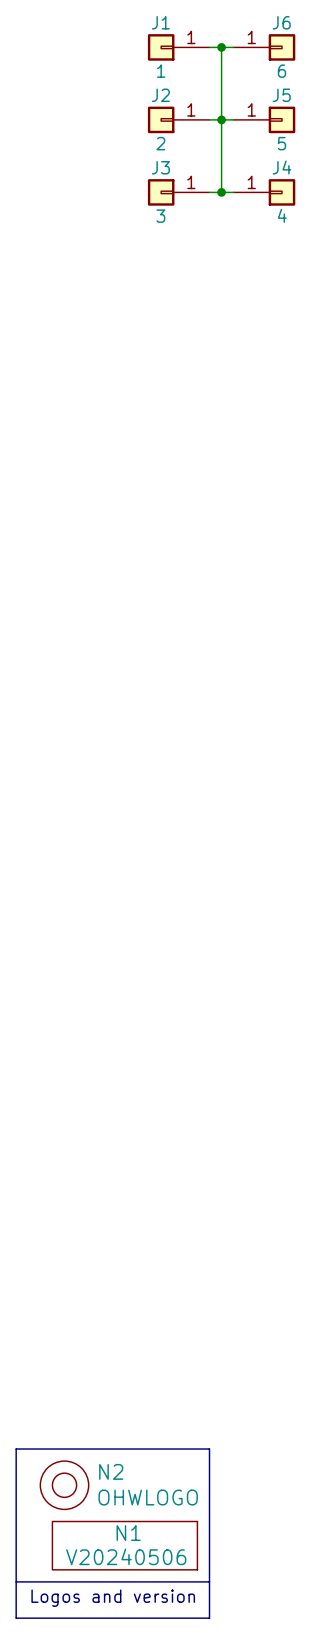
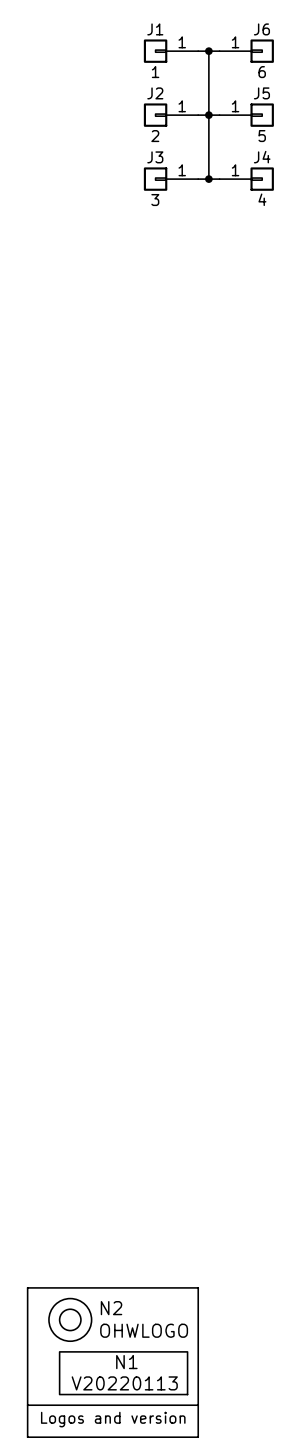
N1 value: V20240506 (126, 1556) -> V20220113 (124, 1383)

